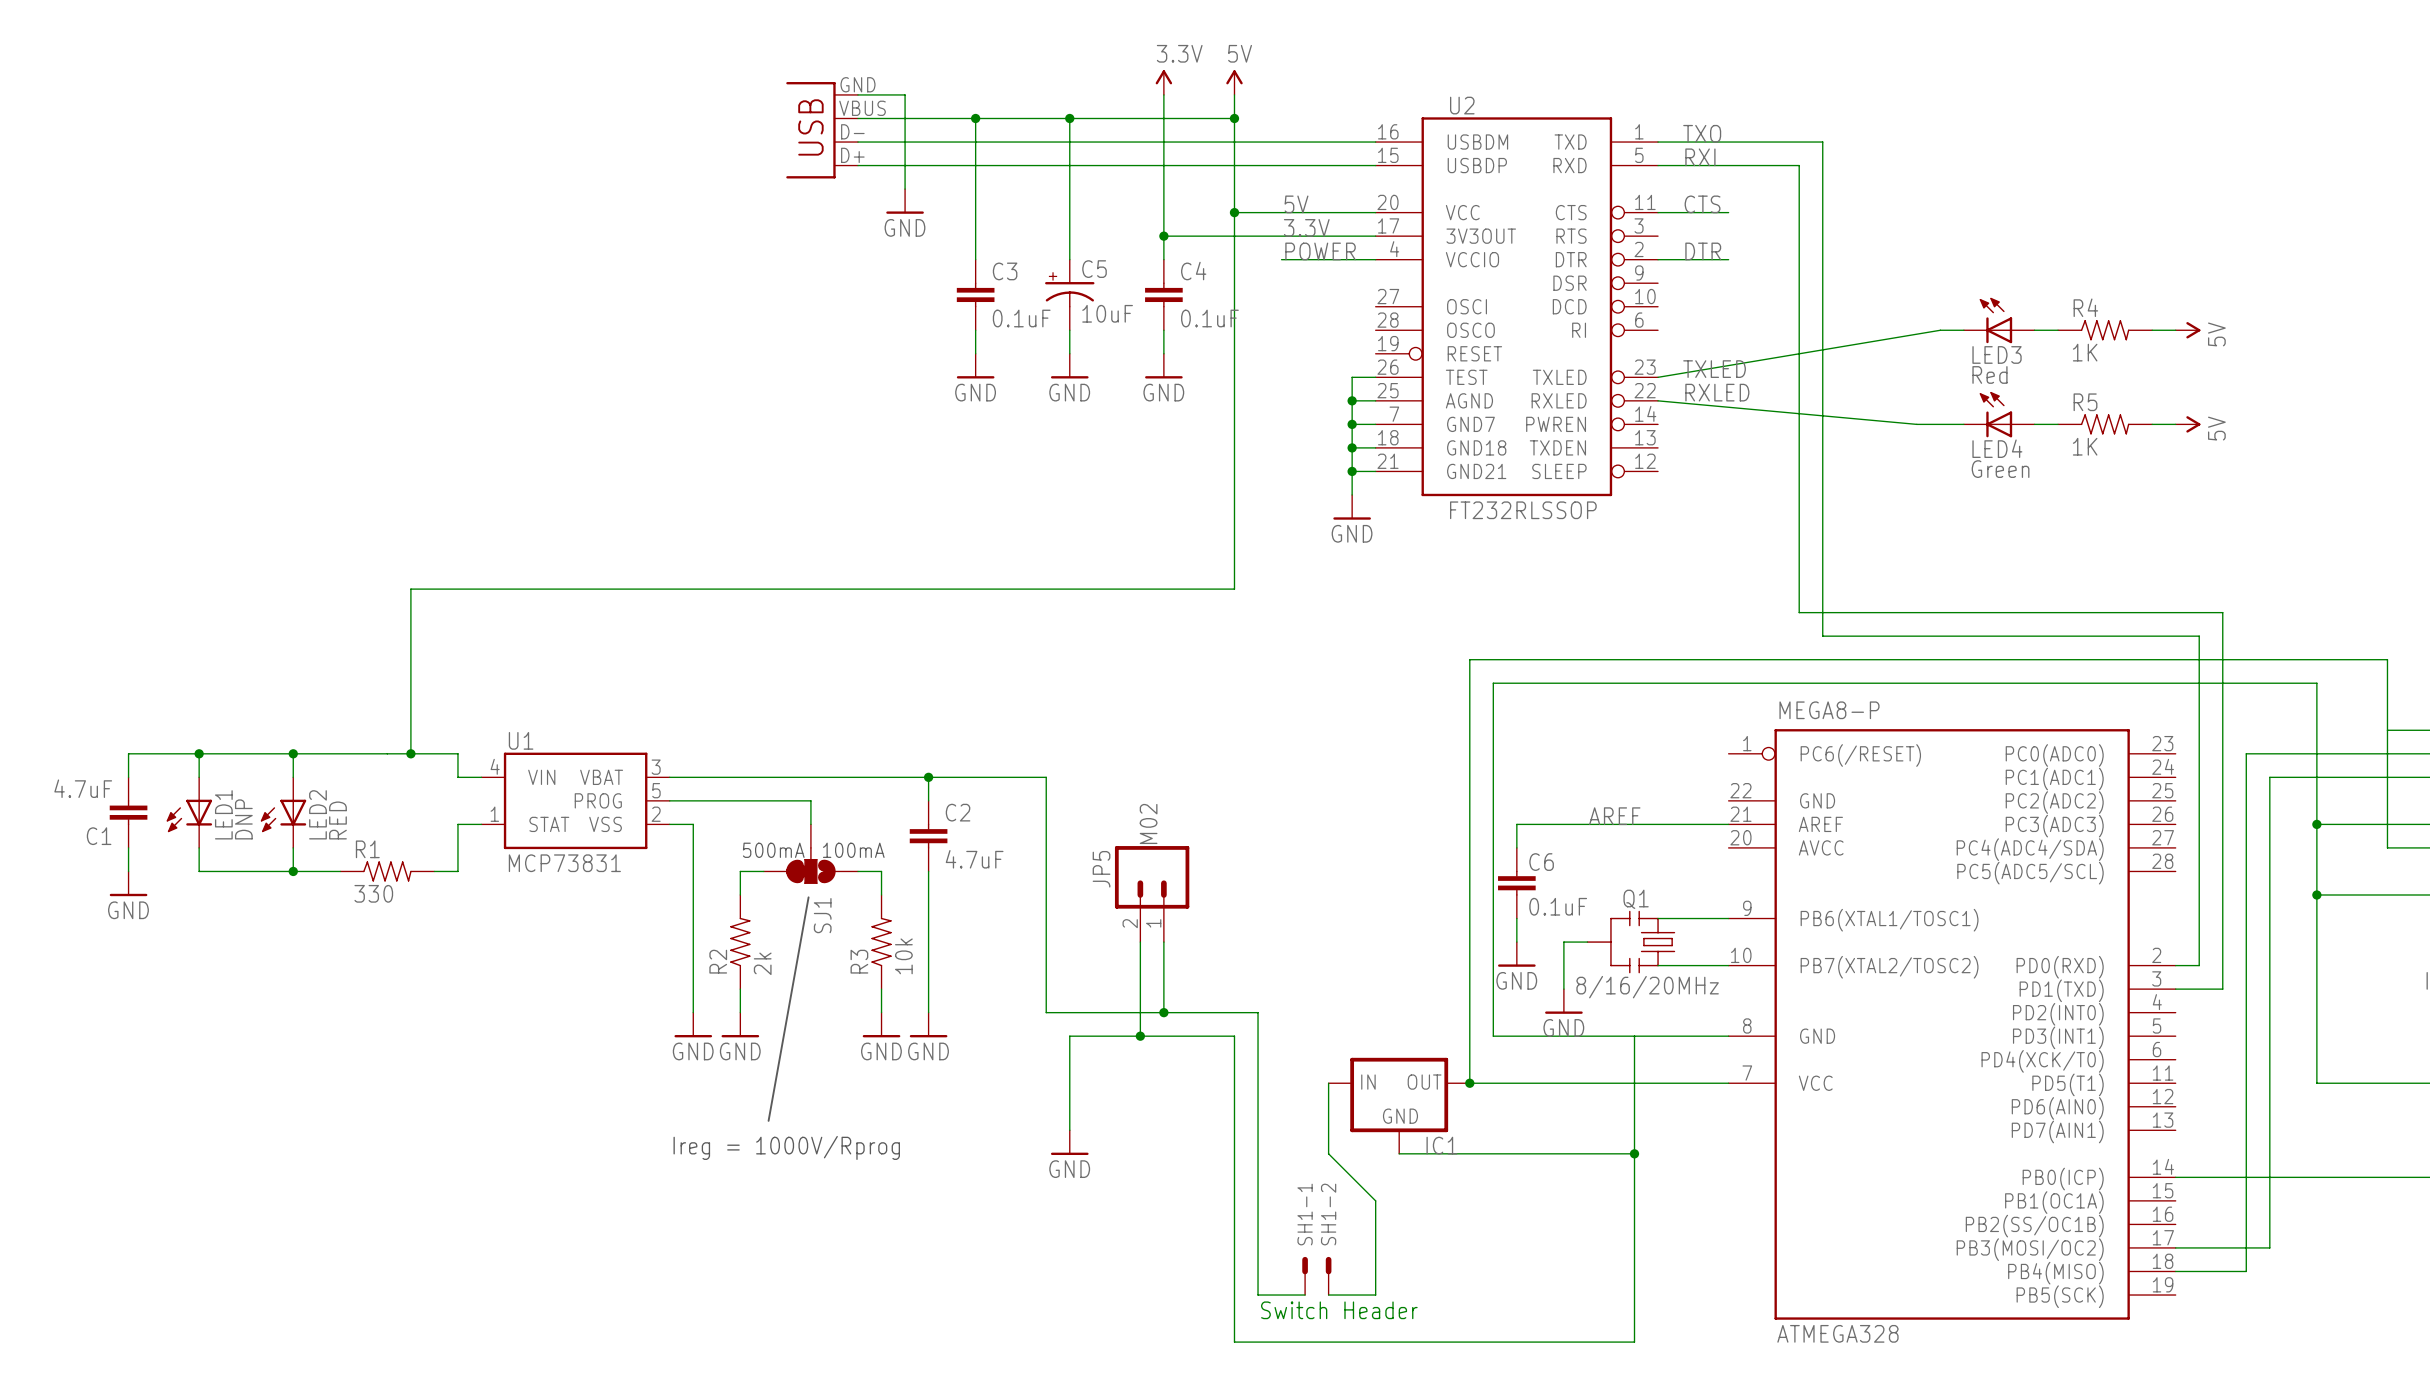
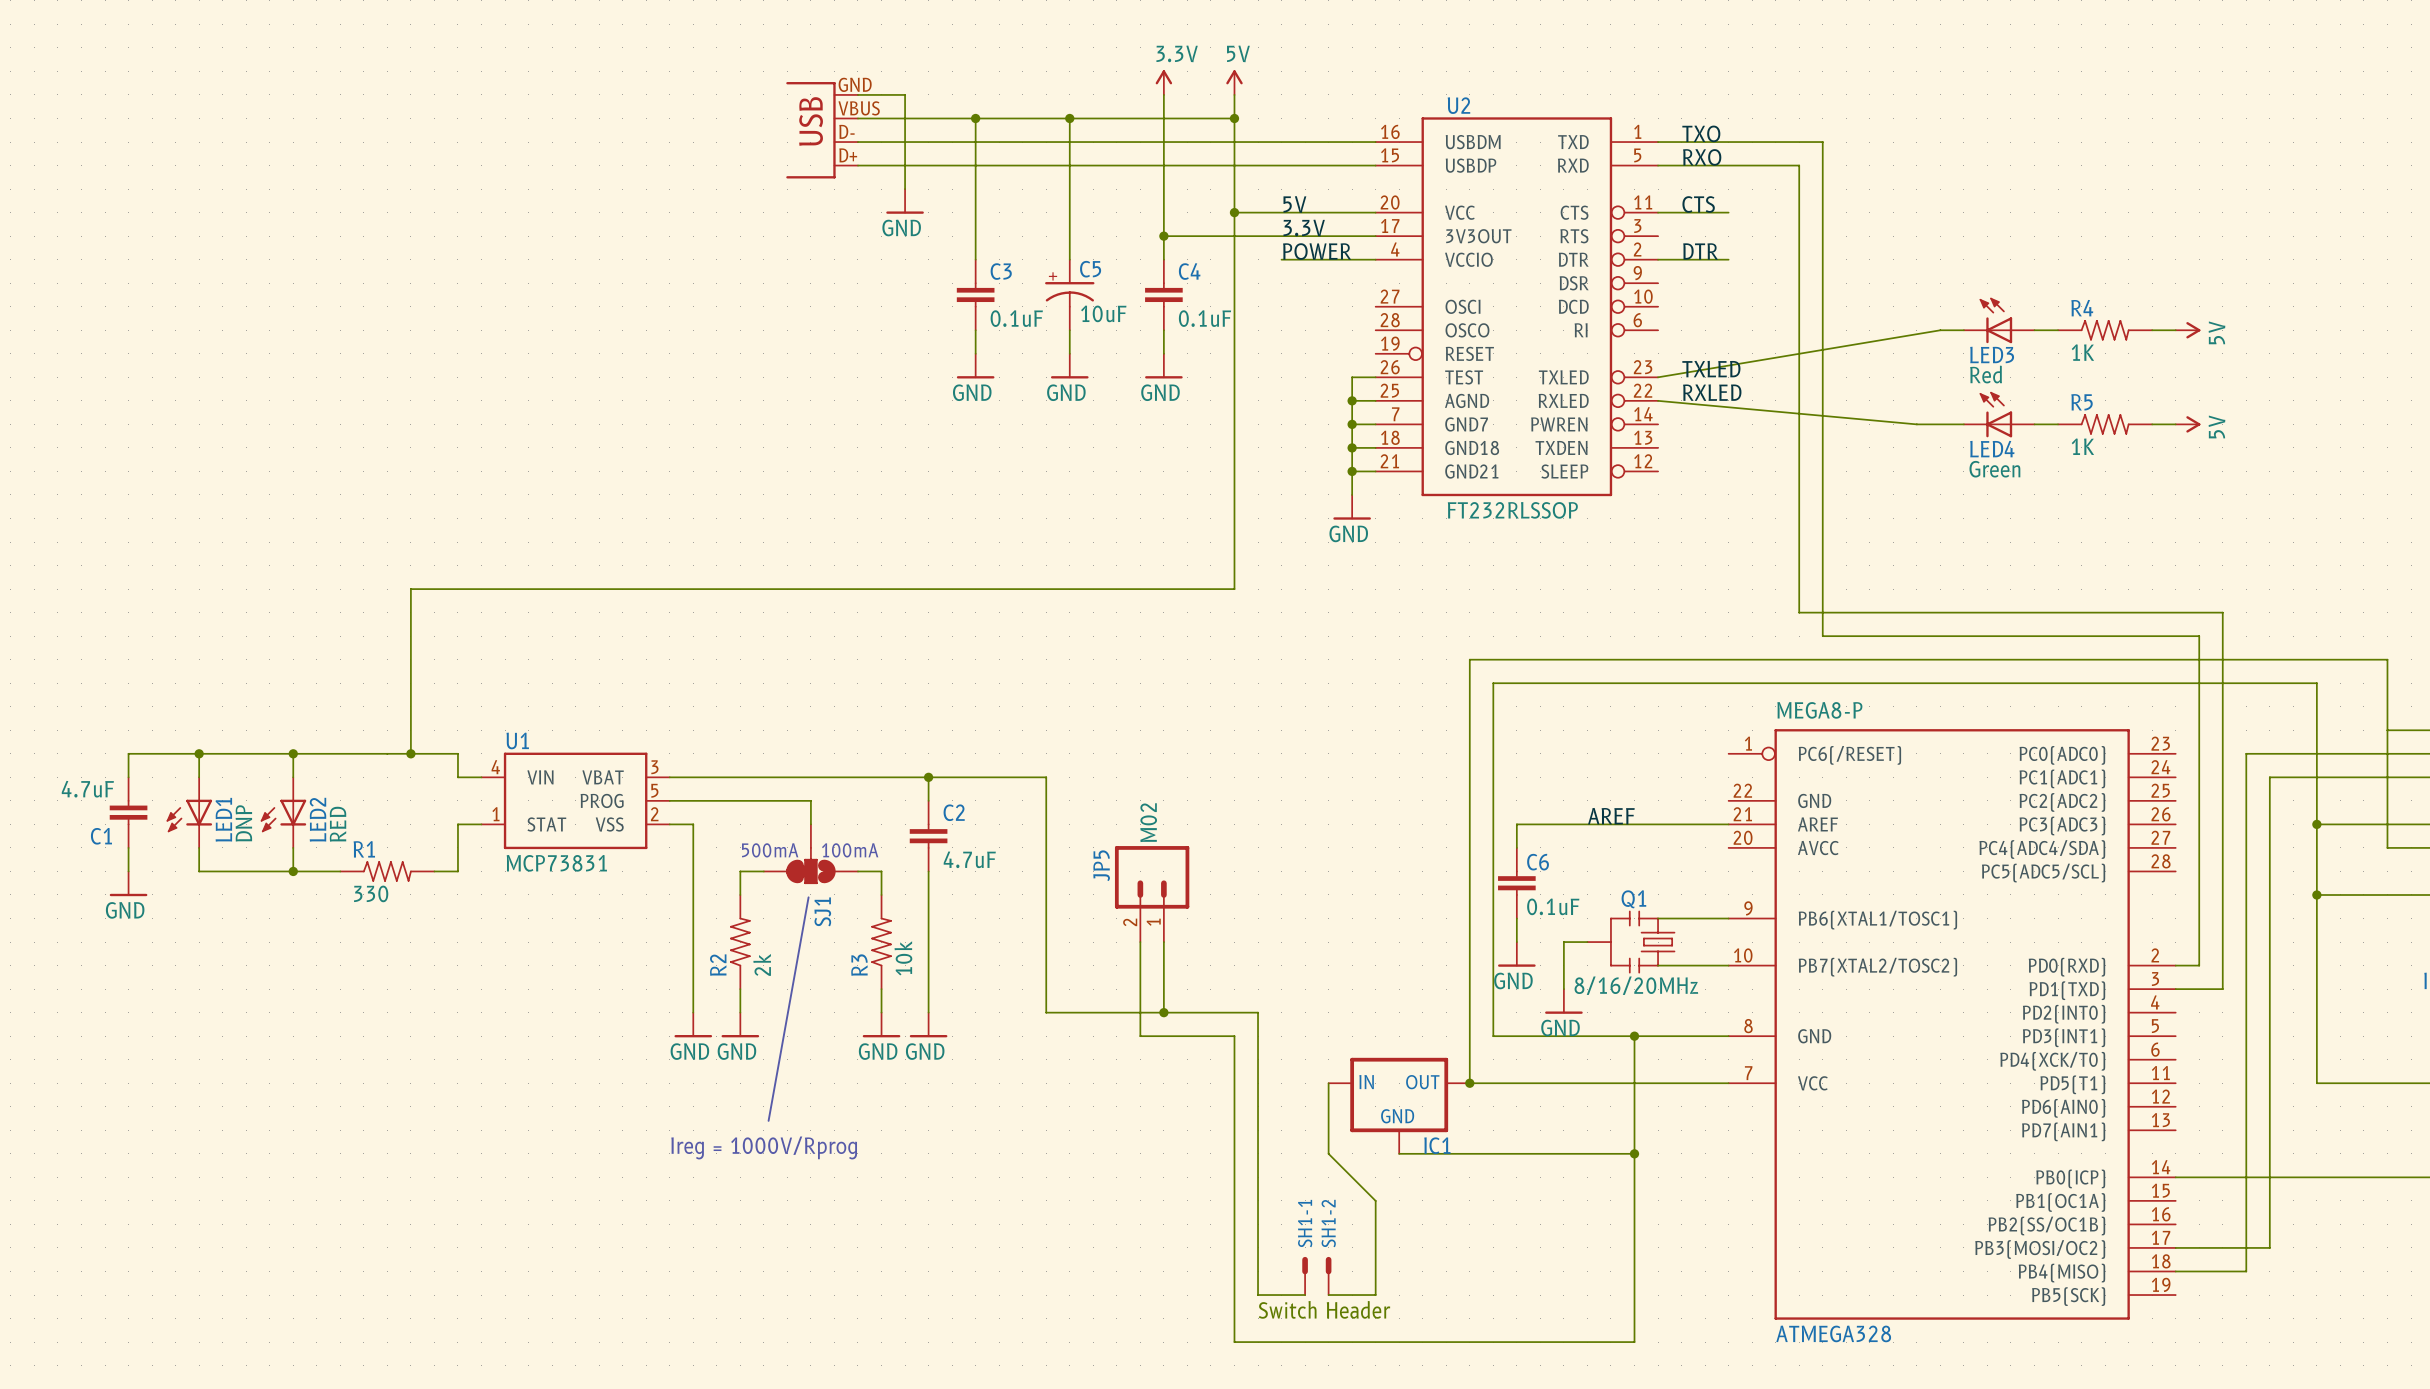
label: RXI (1700, 157) -> RXO (1702, 157)
wire: (1140, 1036) (1069, 1036) (1069, 1130) -> none
junction: (1140, 1036) -> none
junction: none -> (1634, 1036)
power symbol: GND (1069, 1142) -> none

